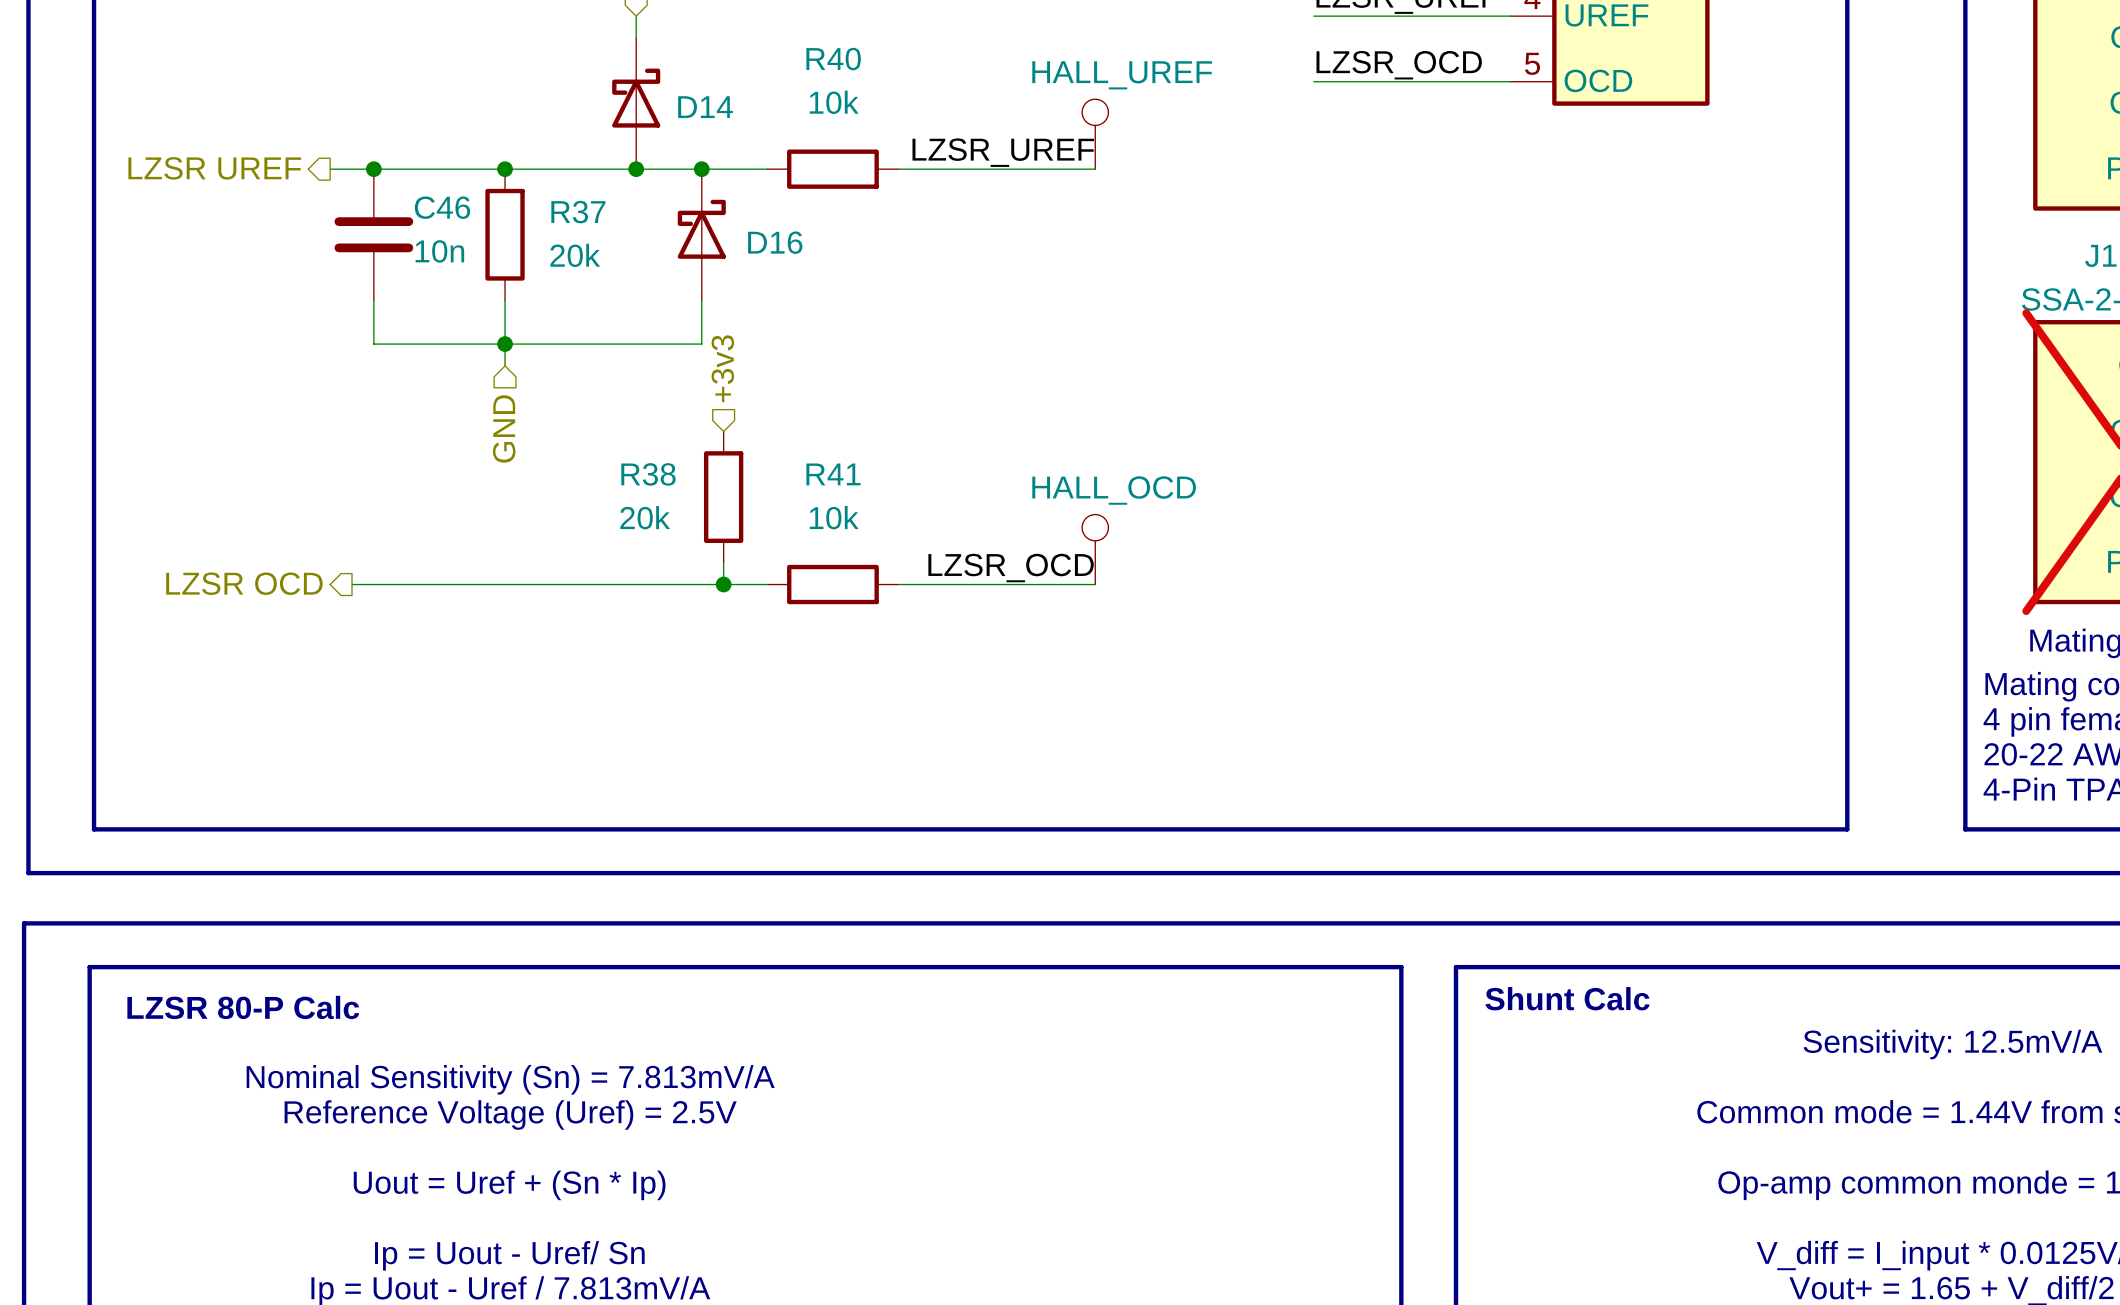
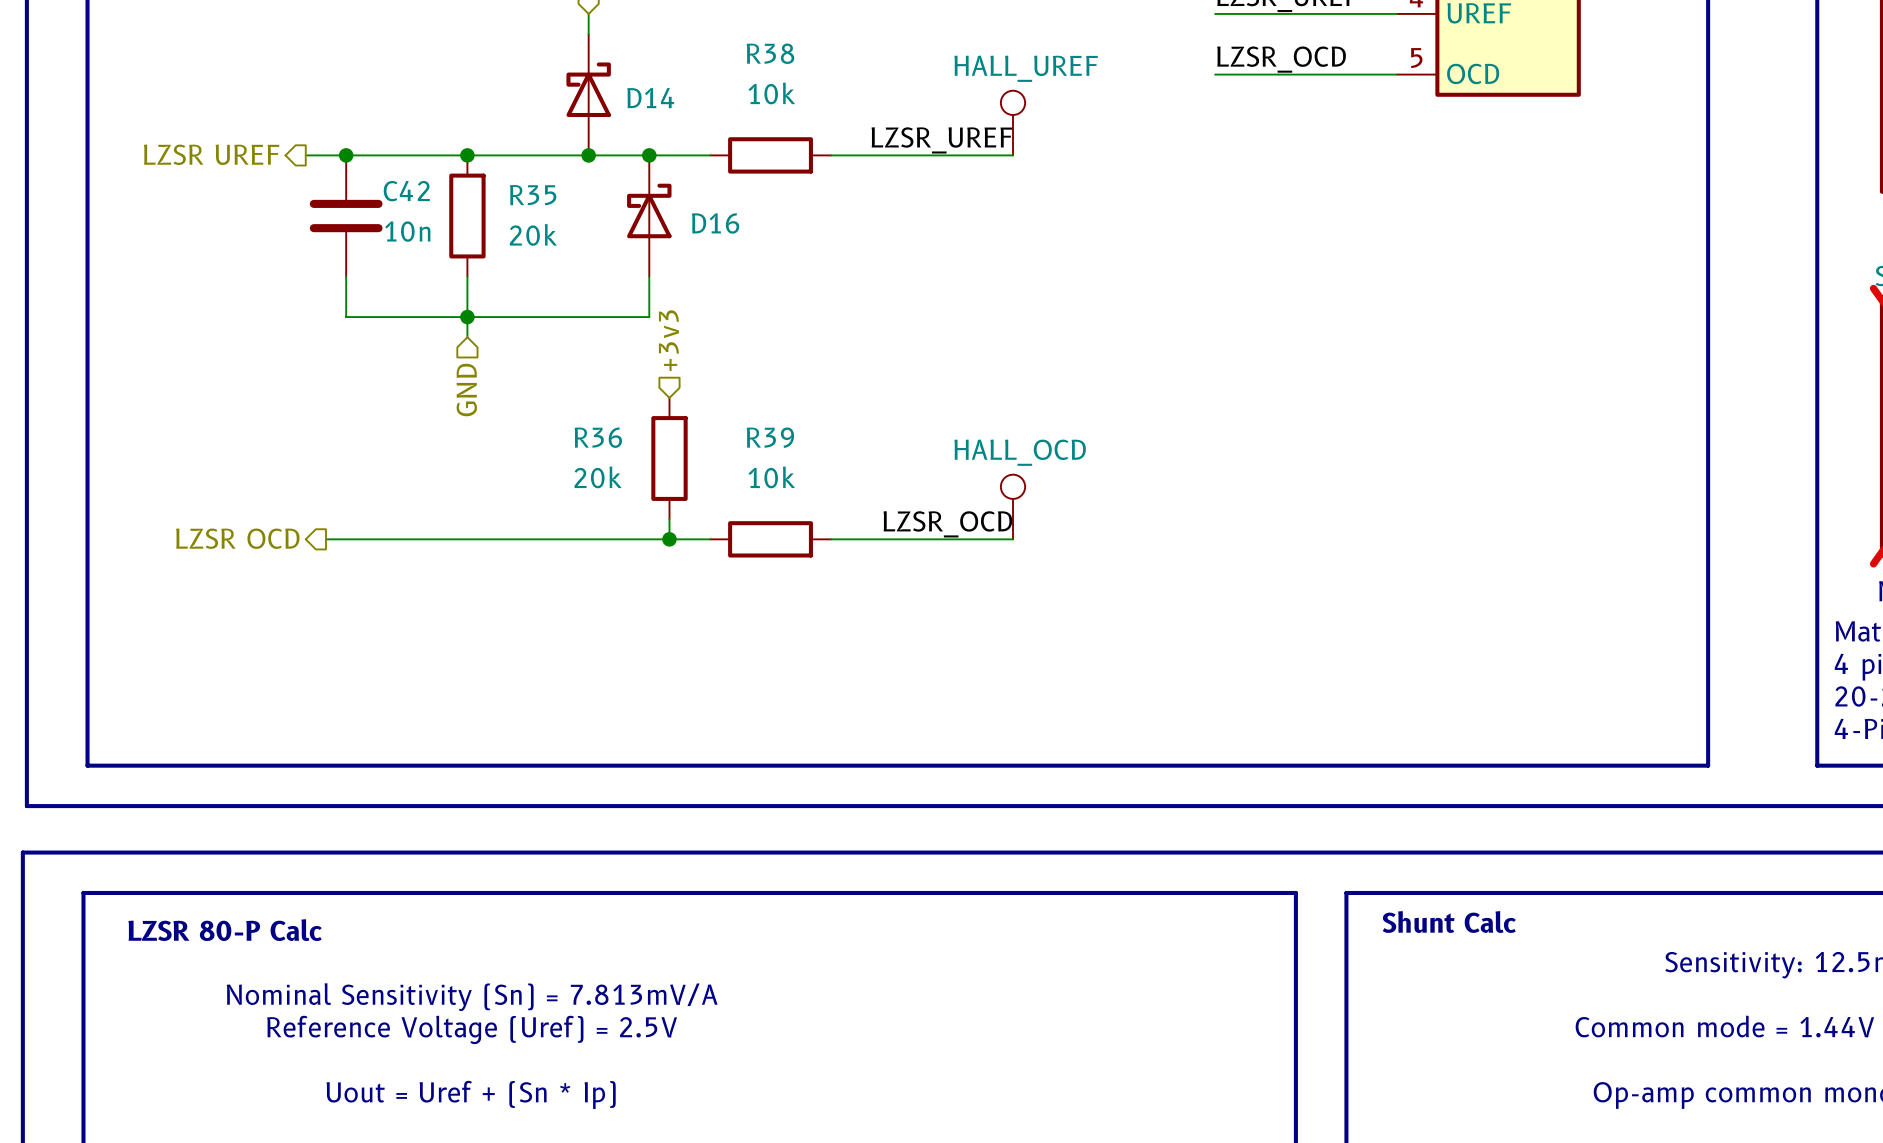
R40 name: R40 (833, 59) -> R38 (770, 53)
C46 name: C46 (442, 207) -> C42 (406, 191)
R37 name: R37 (578, 212) -> R35 (533, 195)
R38 name: R38 (648, 474) -> R36 (598, 437)
R41 name: R41 (833, 474) -> R39 (770, 437)

